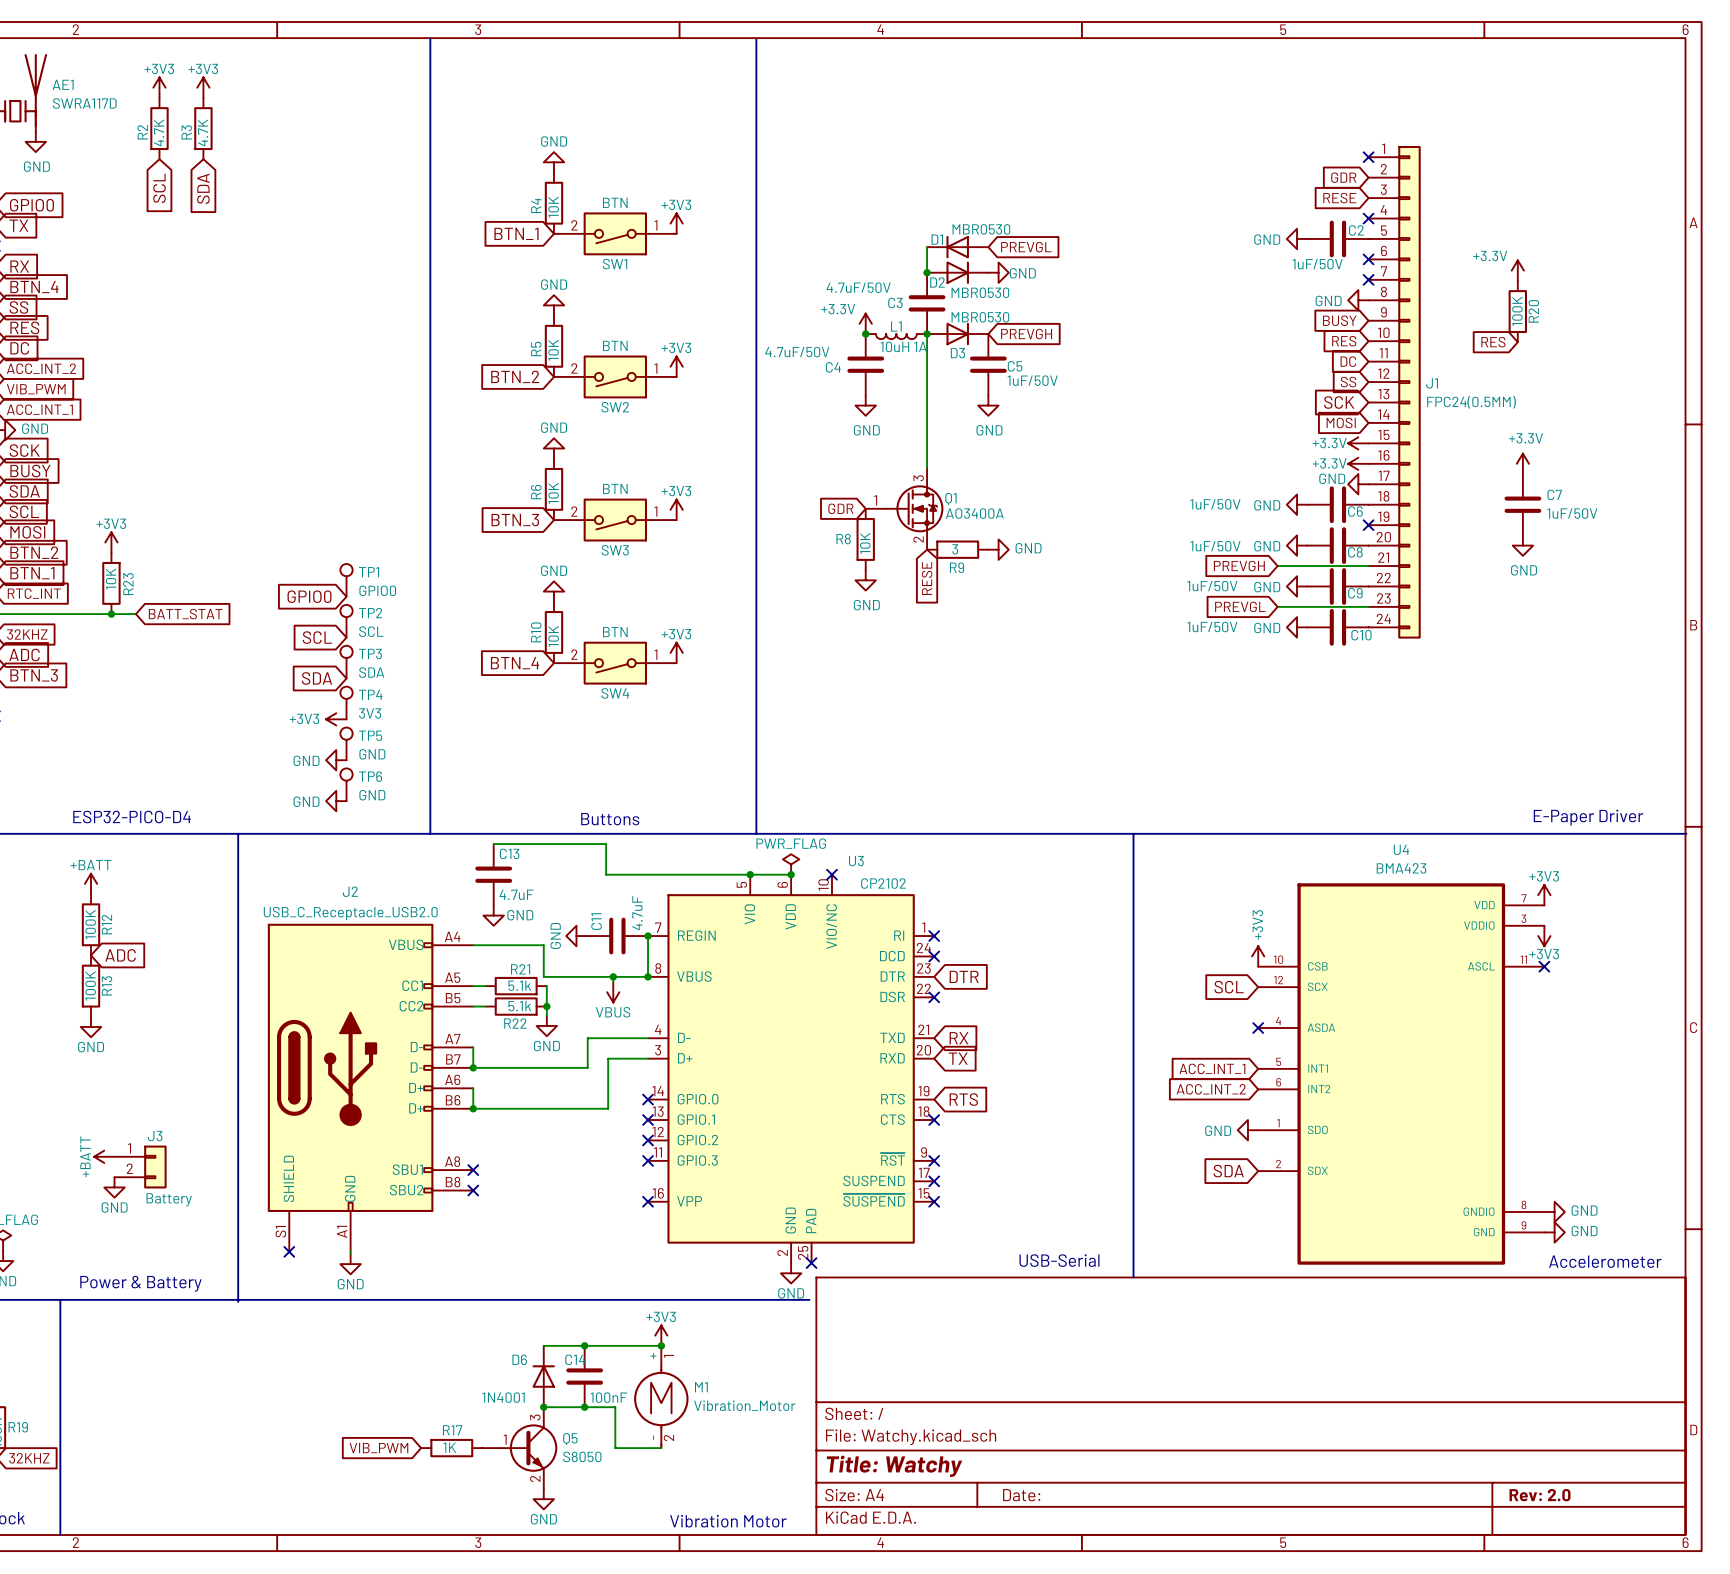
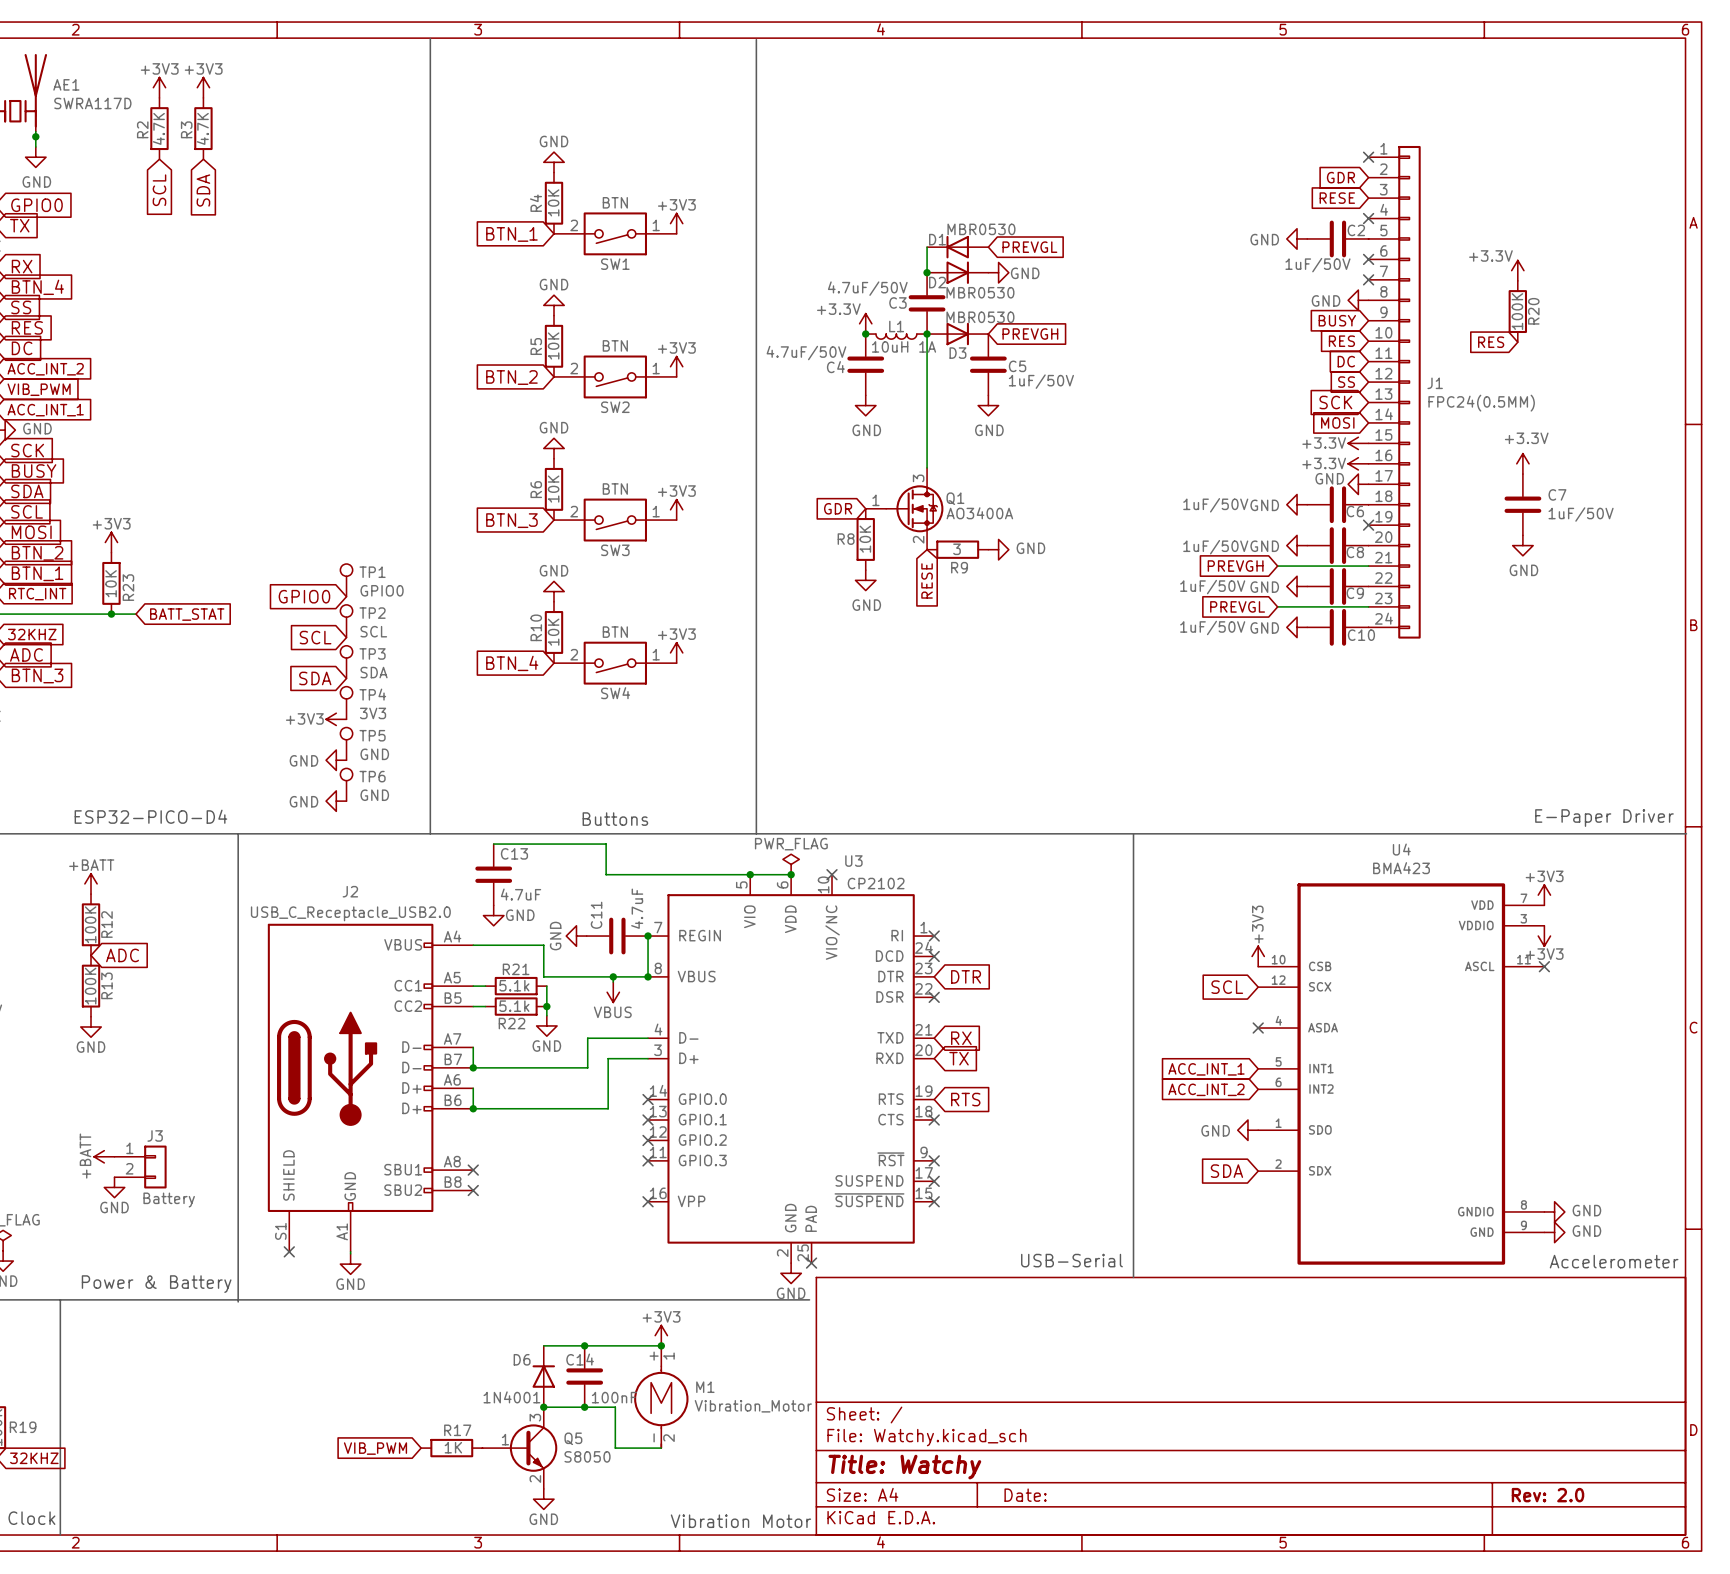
junction: none -> (35, 136)
power symbol position: GND (35, 141) -> GND (35, 157)

